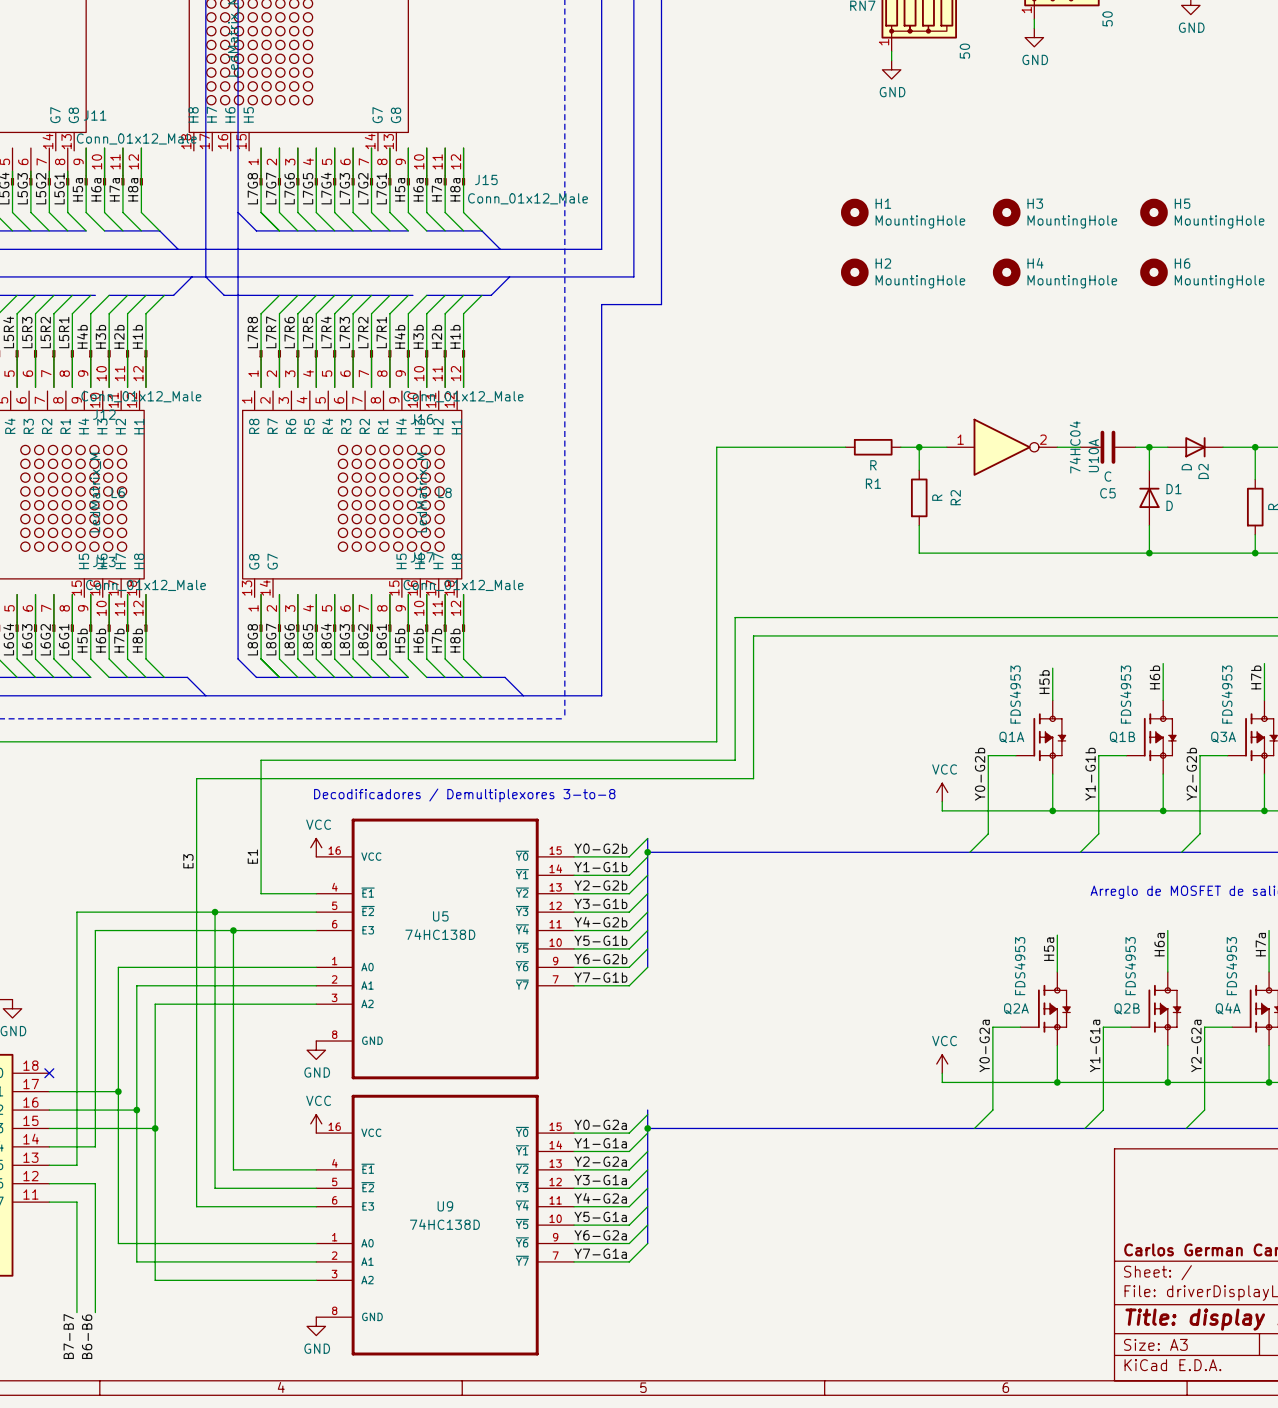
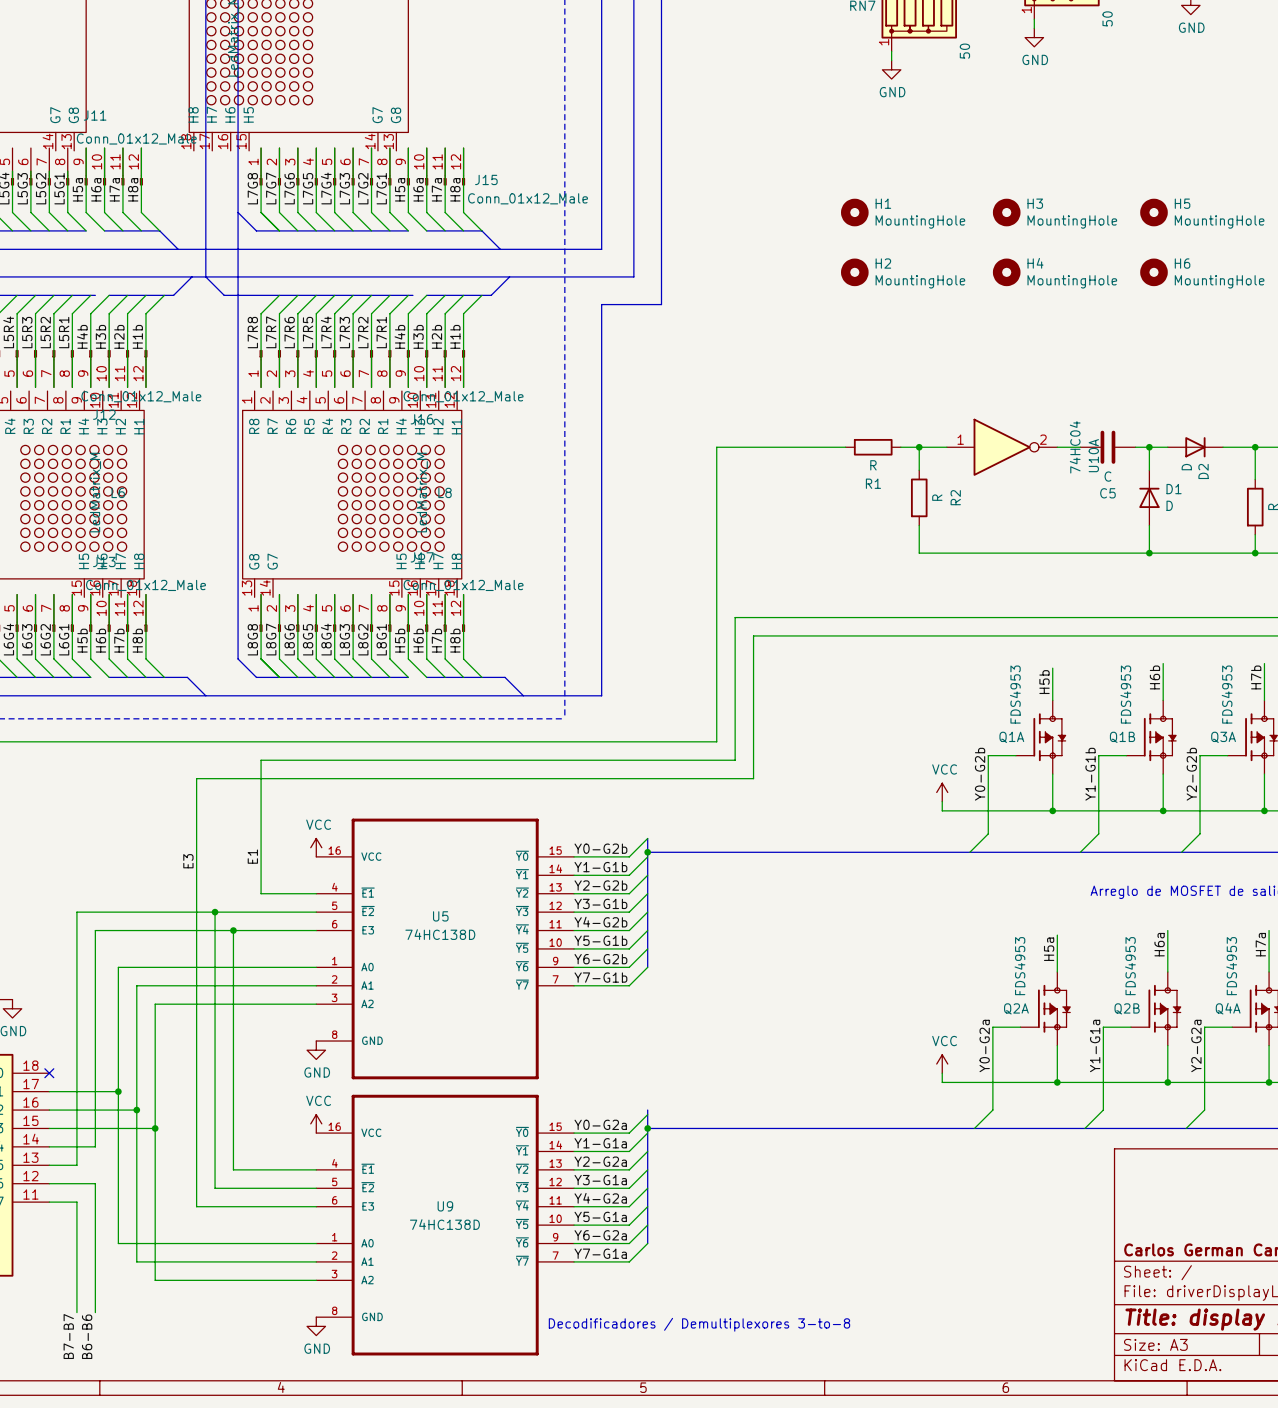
text: Decodificadores / Demultiplexores 3-to-8 (464, 795) -> none
text: none -> Decodificadores / Demultiplexores 3-to-8 (699, 1324)

